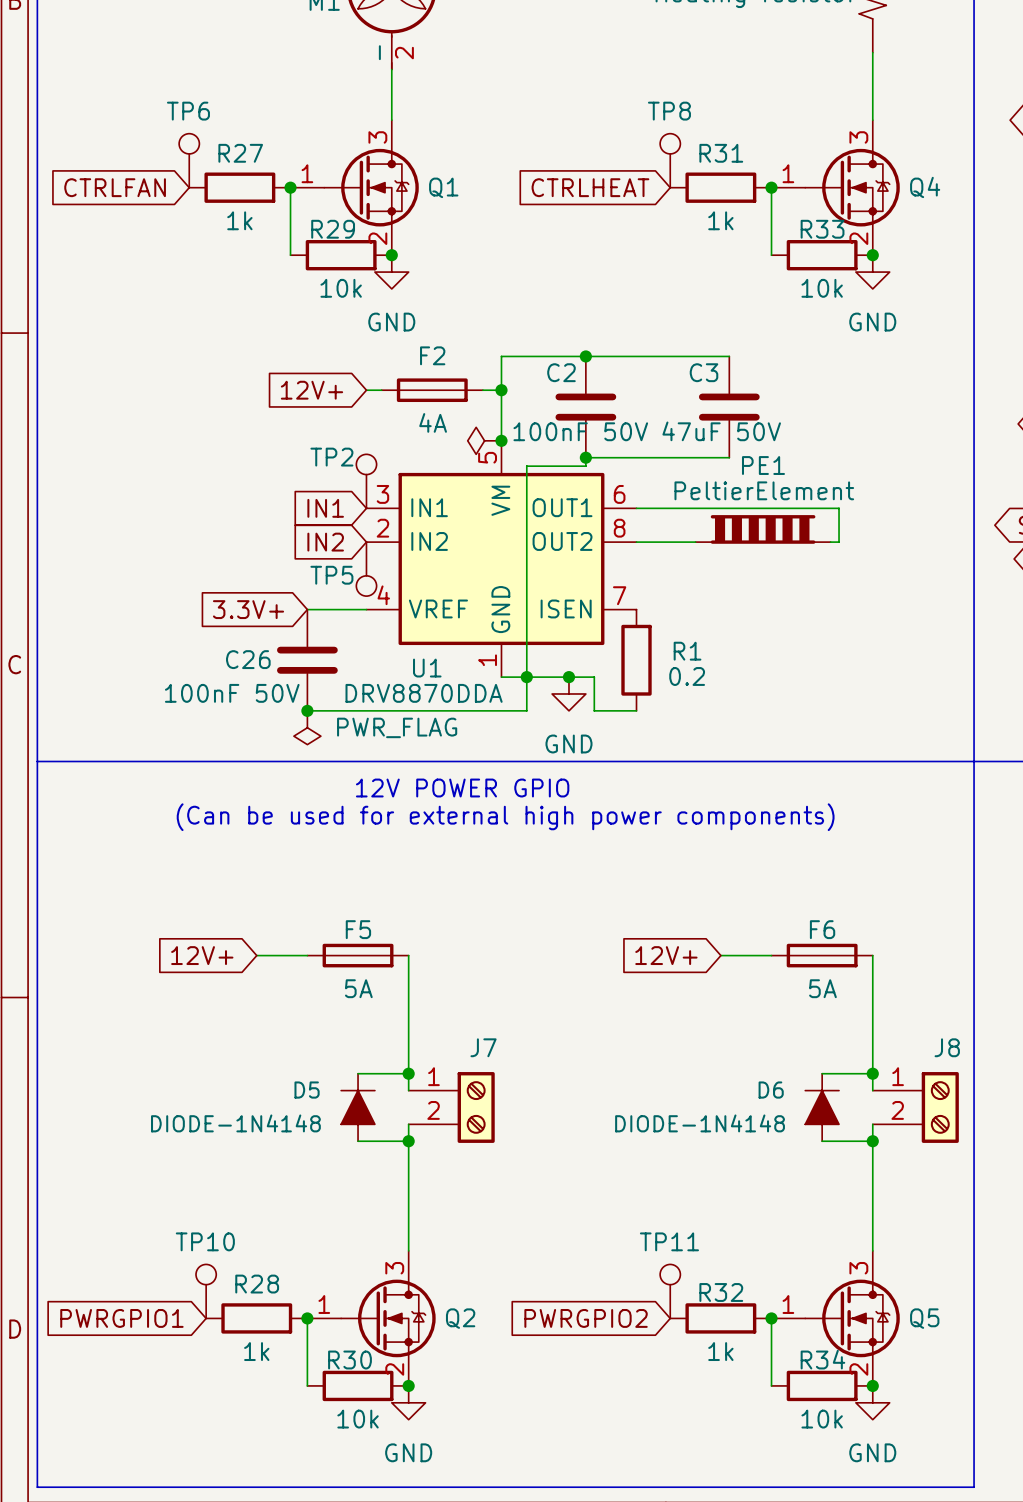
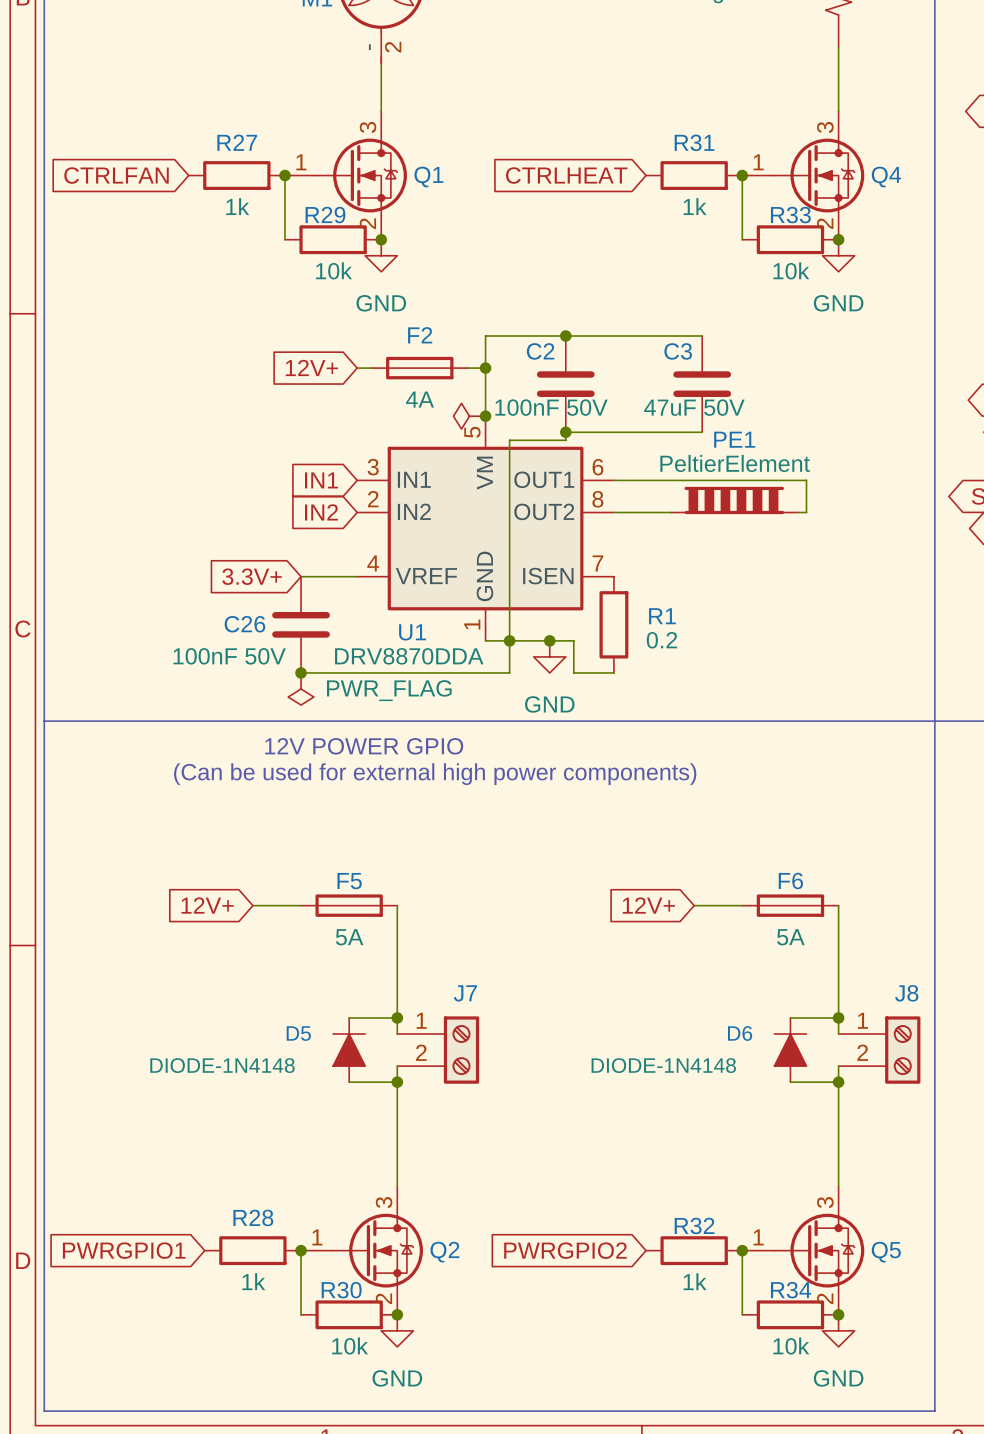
TP6: (189, 160) -> none
TP8: (670, 160) -> none
TP2: (366, 481) -> none
TP5: (366, 569) -> none
TP10: (206, 1291) -> none
TP11: (670, 1291) -> none

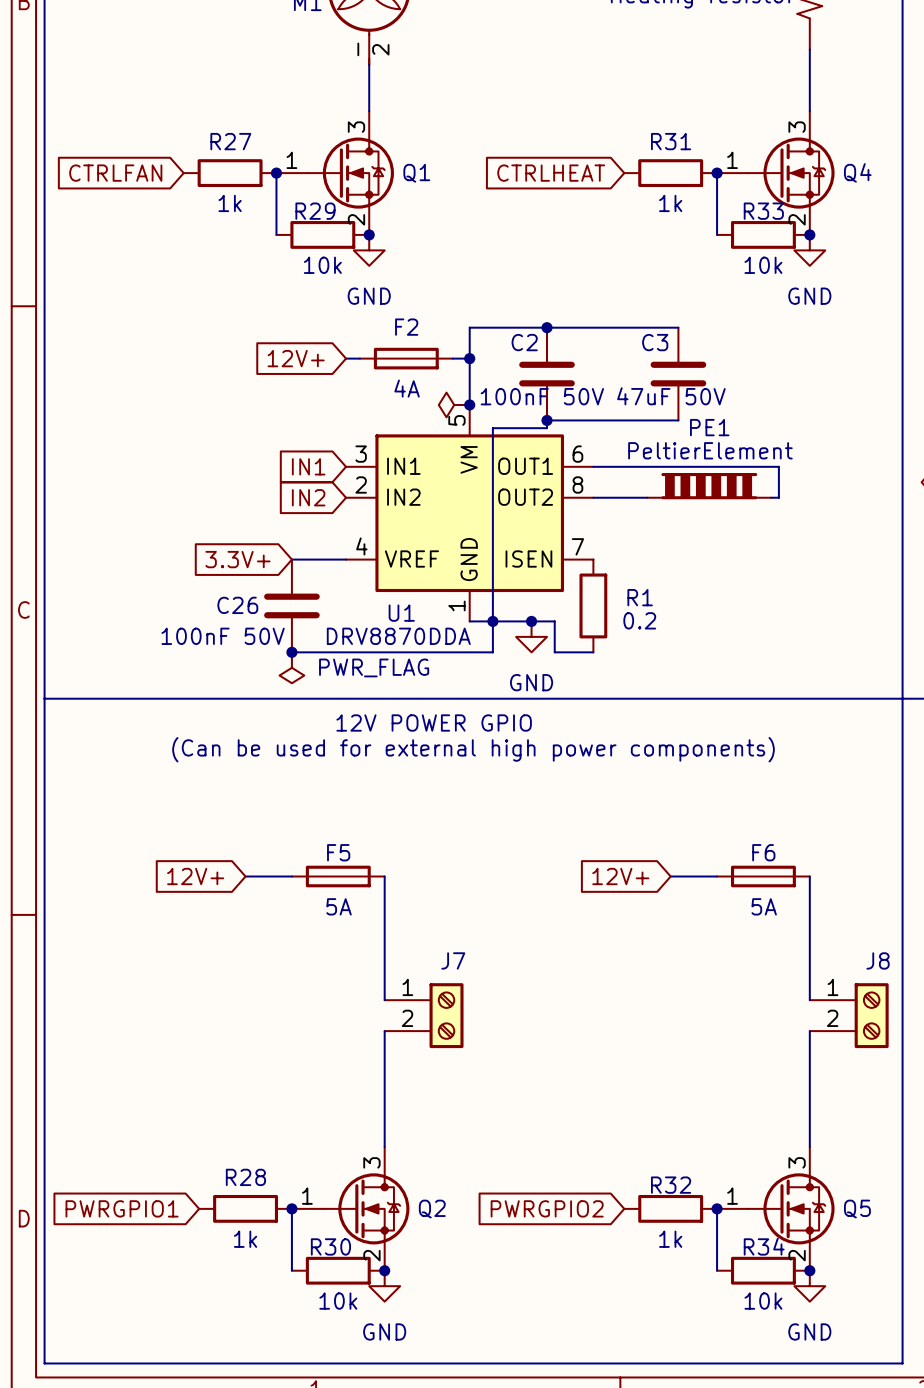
wire: (349, 1017) (397, 1017) -> none
junction: (397, 1017) -> none
wire: (790, 1017) (838, 1017) -> none
junction: (838, 1017) -> none
D5: DIODE-1N4148 (349, 1050) -> none
D6: DIODE-1N4148 (790, 1050) -> none
wire: (349, 1082) (397, 1082) -> none
junction: (397, 1082) -> none
wire: (790, 1082) (838, 1082) -> none
junction: (838, 1082) -> none

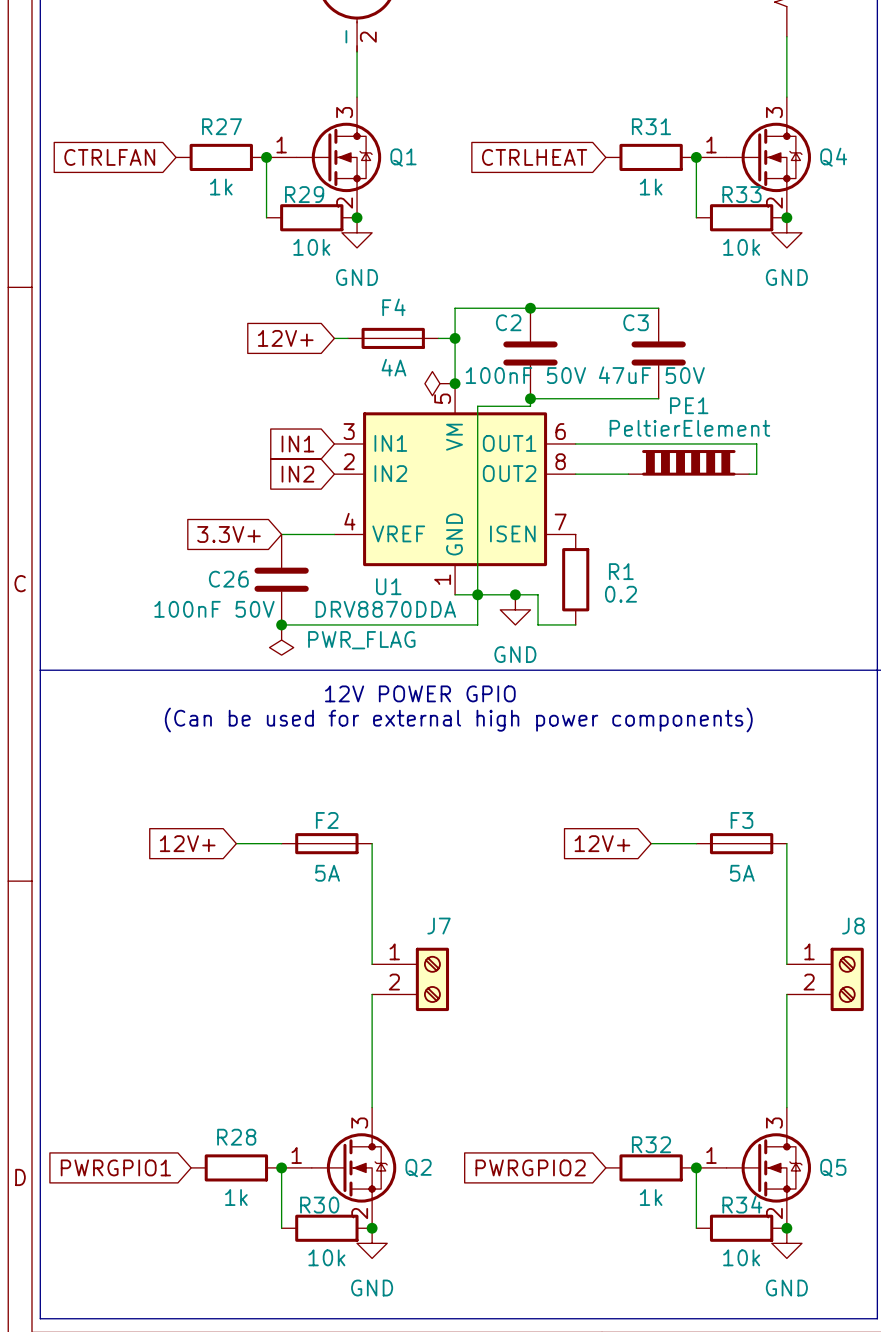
F2 name: F2 (406, 327) -> F4 (393, 307)
F5 name: F5 (338, 852) -> F2 (327, 820)
F6 name: F6 (763, 852) -> F3 (741, 820)

